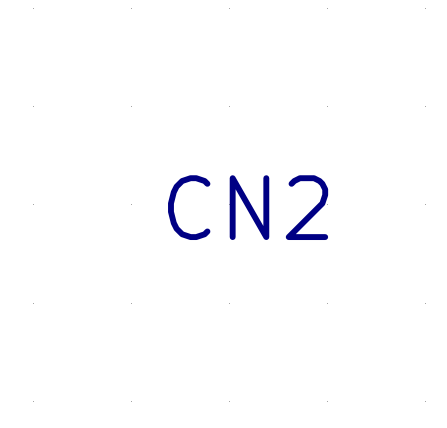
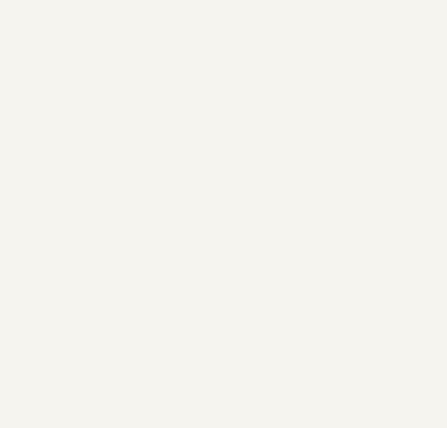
text: CN2 (248, 207) -> none

